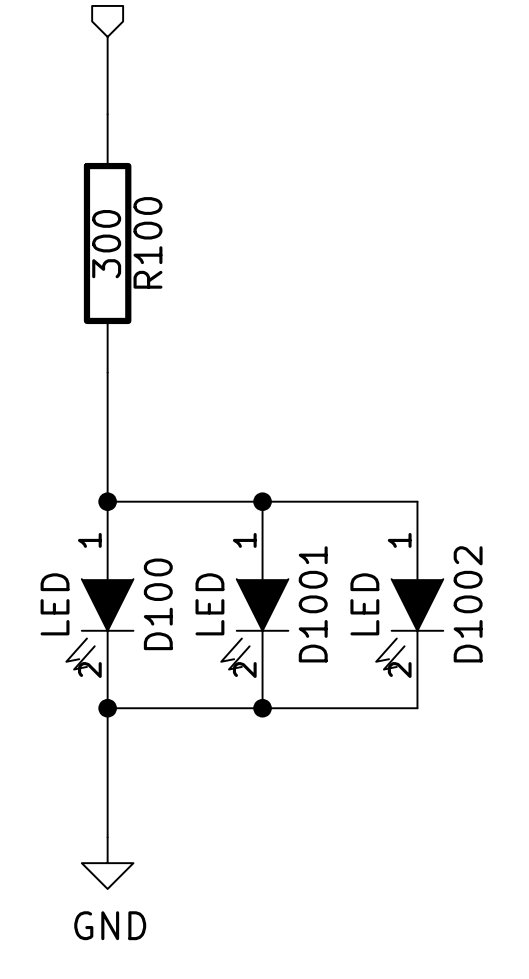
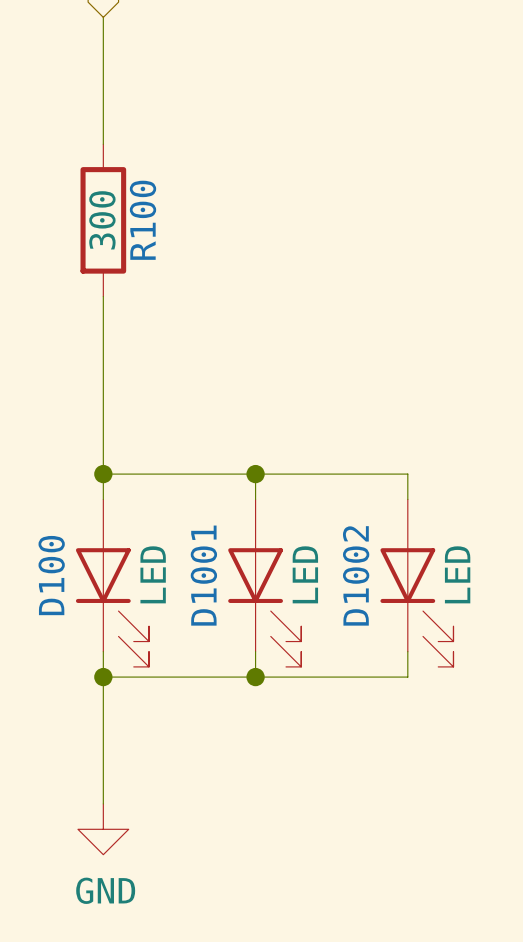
R100 symbol: [83, 114, 132, 373] -> [80, 144, 127, 297]
D100 symbol: [66, 501, 134, 709] -> [75, 499, 150, 667]
D1001 symbol: [221, 501, 289, 709] -> [228, 499, 302, 667]
D1002 symbol: [376, 501, 444, 709] -> [380, 499, 454, 667]
D100 value position: LED (55, 604) -> LED (153, 574)
D100 name position: D100 (158, 604) -> D100 (51, 575)
D1001 value position: LED (209, 604) -> LED (305, 574)
D1001 name position: D1001 (313, 604) -> D1001 (203, 575)
D1002 value position: LED (364, 604) -> LED (457, 574)
D1002 name position: D1002 (468, 604) -> D1002 (356, 575)

